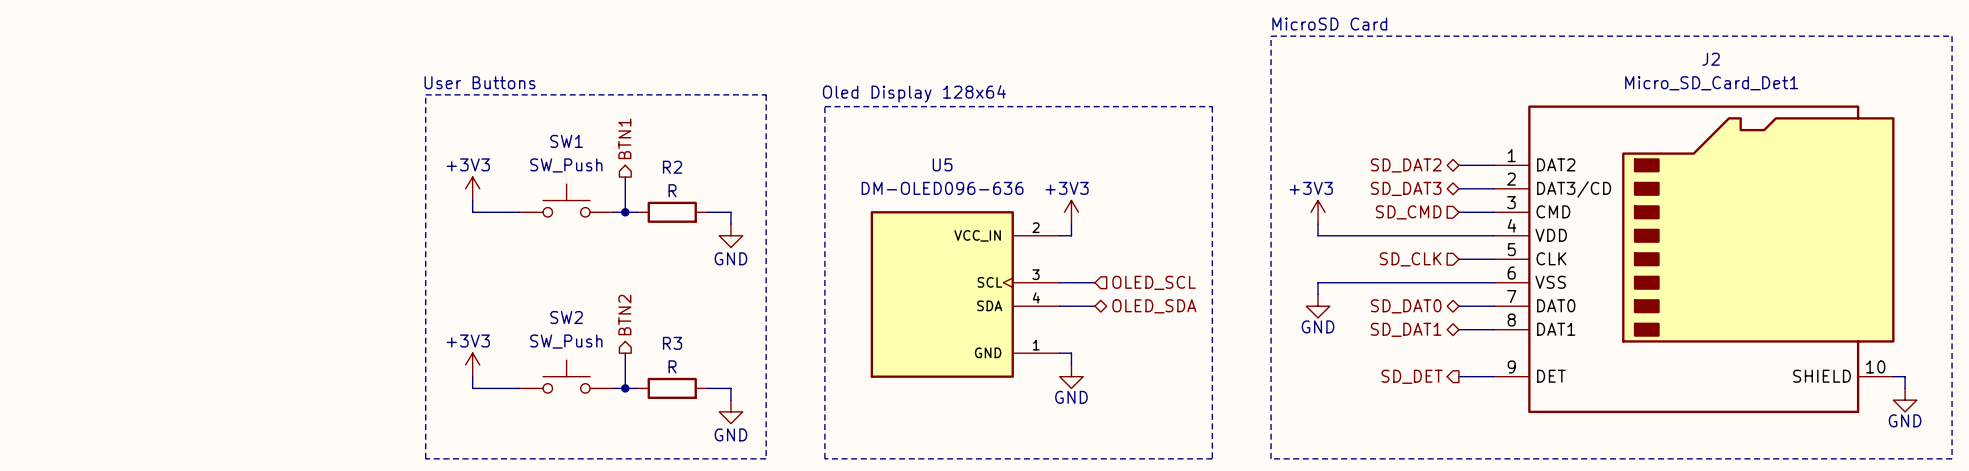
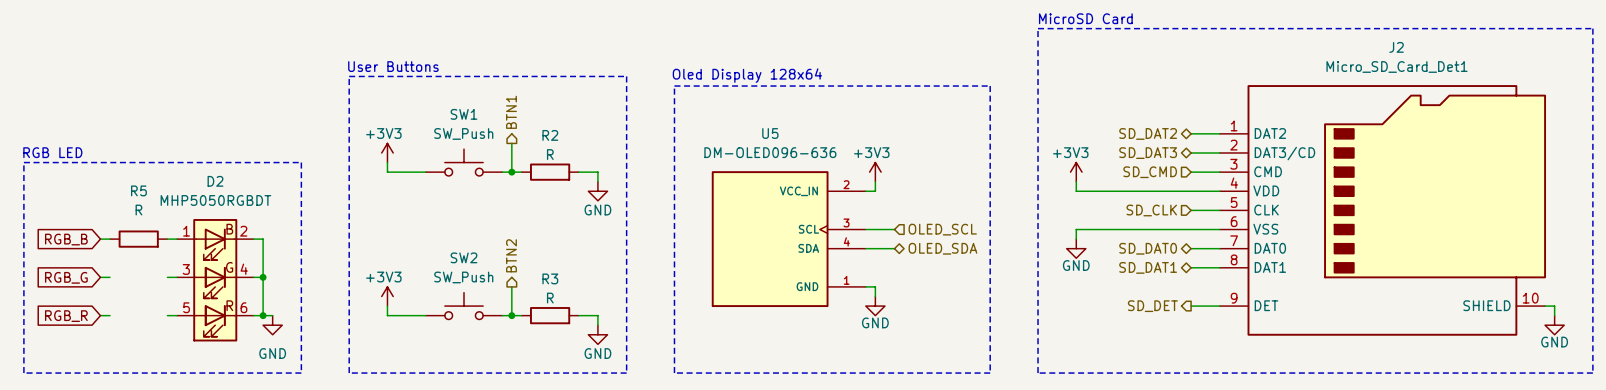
text: none -> RGB LED (52, 152)
line: none -> (23, 162) (301, 162) (301, 373) (23, 373) (23, 162)
wire: none -> (100, 239) (110, 239)
R5: none -> R (138, 239)
wire: none -> (167, 239) (176, 239)
wire: none -> (253, 239) (263, 239) (263, 315)
global label: none -> RGB_B (66, 239)
wire: none -> (100, 277) (110, 277)
wire: none -> (167, 277) (176, 277)
wire: none -> (253, 277) (263, 277)
junction: none -> (263, 277)
global label: none -> RGB_G (66, 277)
D2: none -> MHP5050RGBDT (215, 280)
global label: none -> RGB_R (66, 316)
wire: none -> (100, 315) (110, 315)
wire: none -> (167, 315) (176, 315)
wire: none -> (253, 315) (272, 315)
junction: none -> (263, 315)
power symbol: none -> GND (272, 325)

